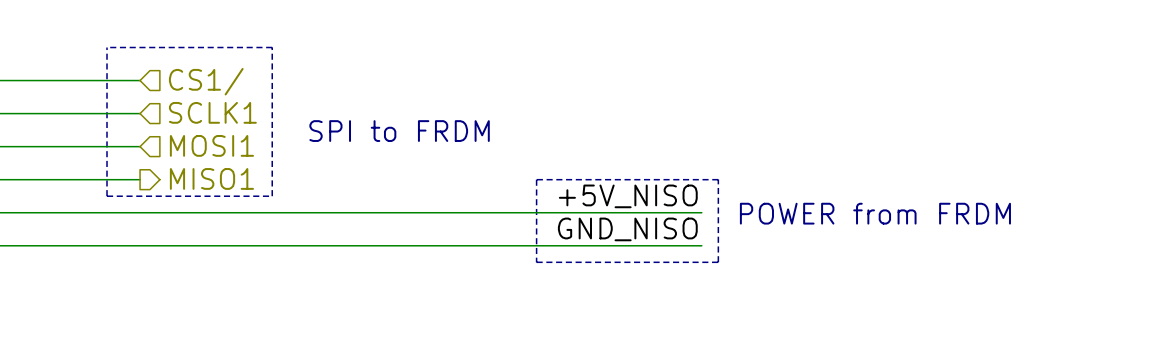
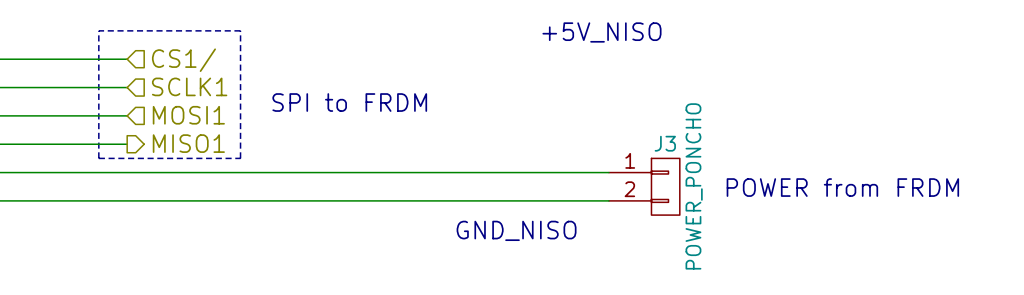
text: none -> +5V_NISO (601, 32)
line: (536, 179) (536, 262) (718, 262) (718, 179) (536, 179) -> none
label: +5V_NISO (628, 196) -> none
text position: POWER from FRDM (875, 213) -> POWER from FRDM (842, 187)
label: GND_NISO (627, 229) -> none
J3: none -> POWER_PONCHO (644, 186)
text: none -> GND_NISO (516, 230)

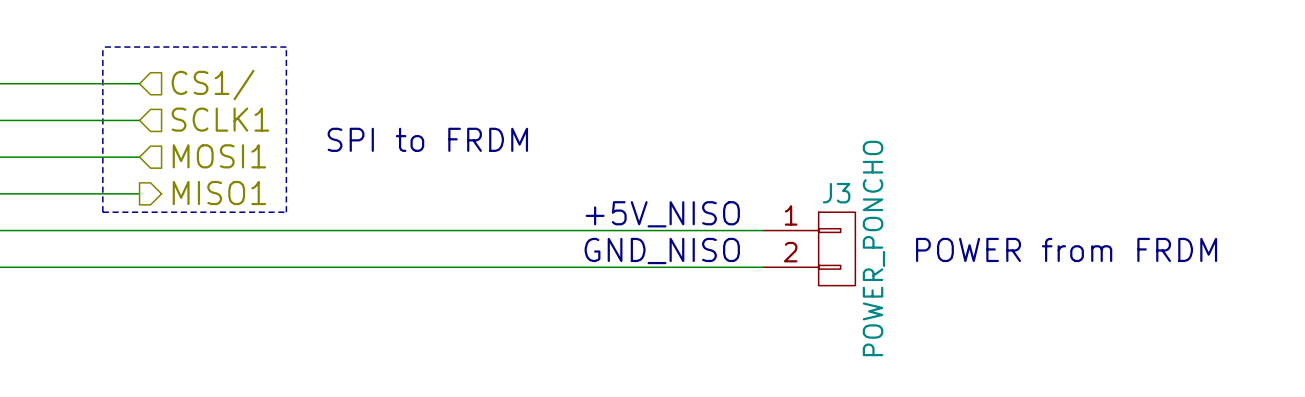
text position: +5V_NISO (601, 32) -> +5V_NISO (662, 214)
text position: GND_NISO (516, 230) -> GND_NISO (662, 250)

